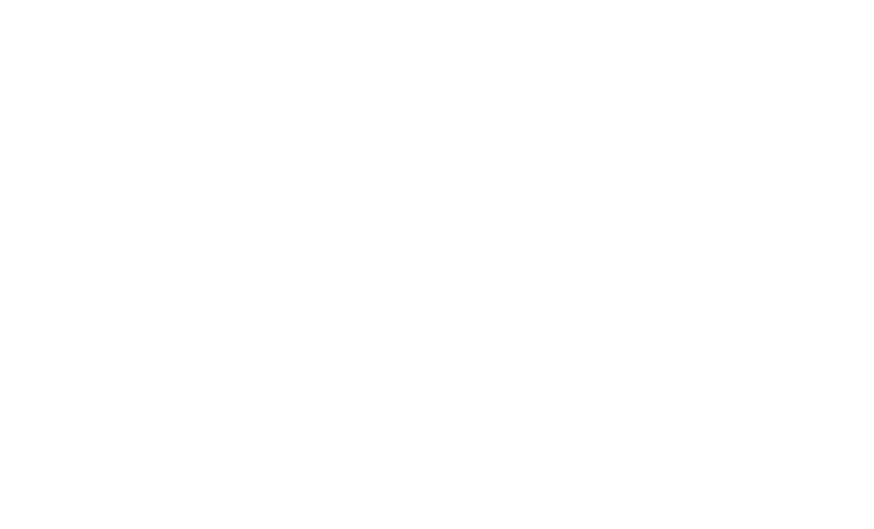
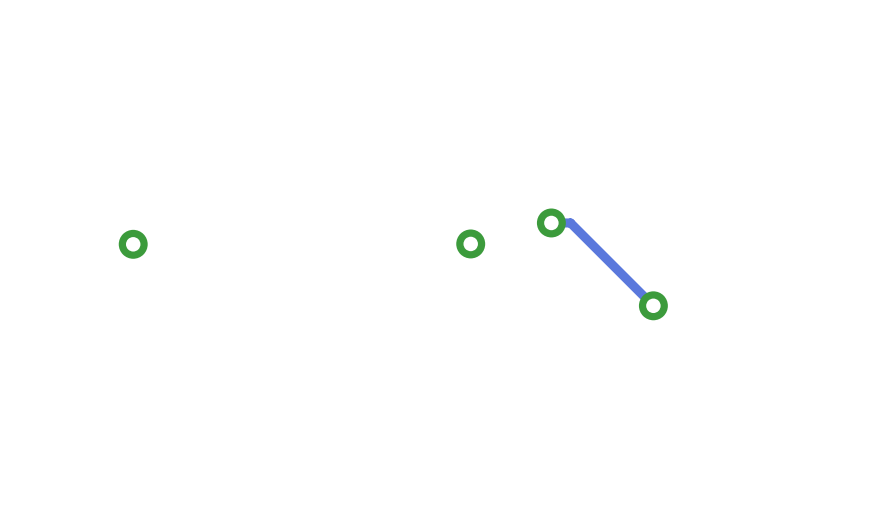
track: none -> (551, 222) (570, 222) (653, 305)
via: none -> (551, 222)
via: none -> (470, 243)
via: none -> (133, 244)
via: none -> (653, 305)

